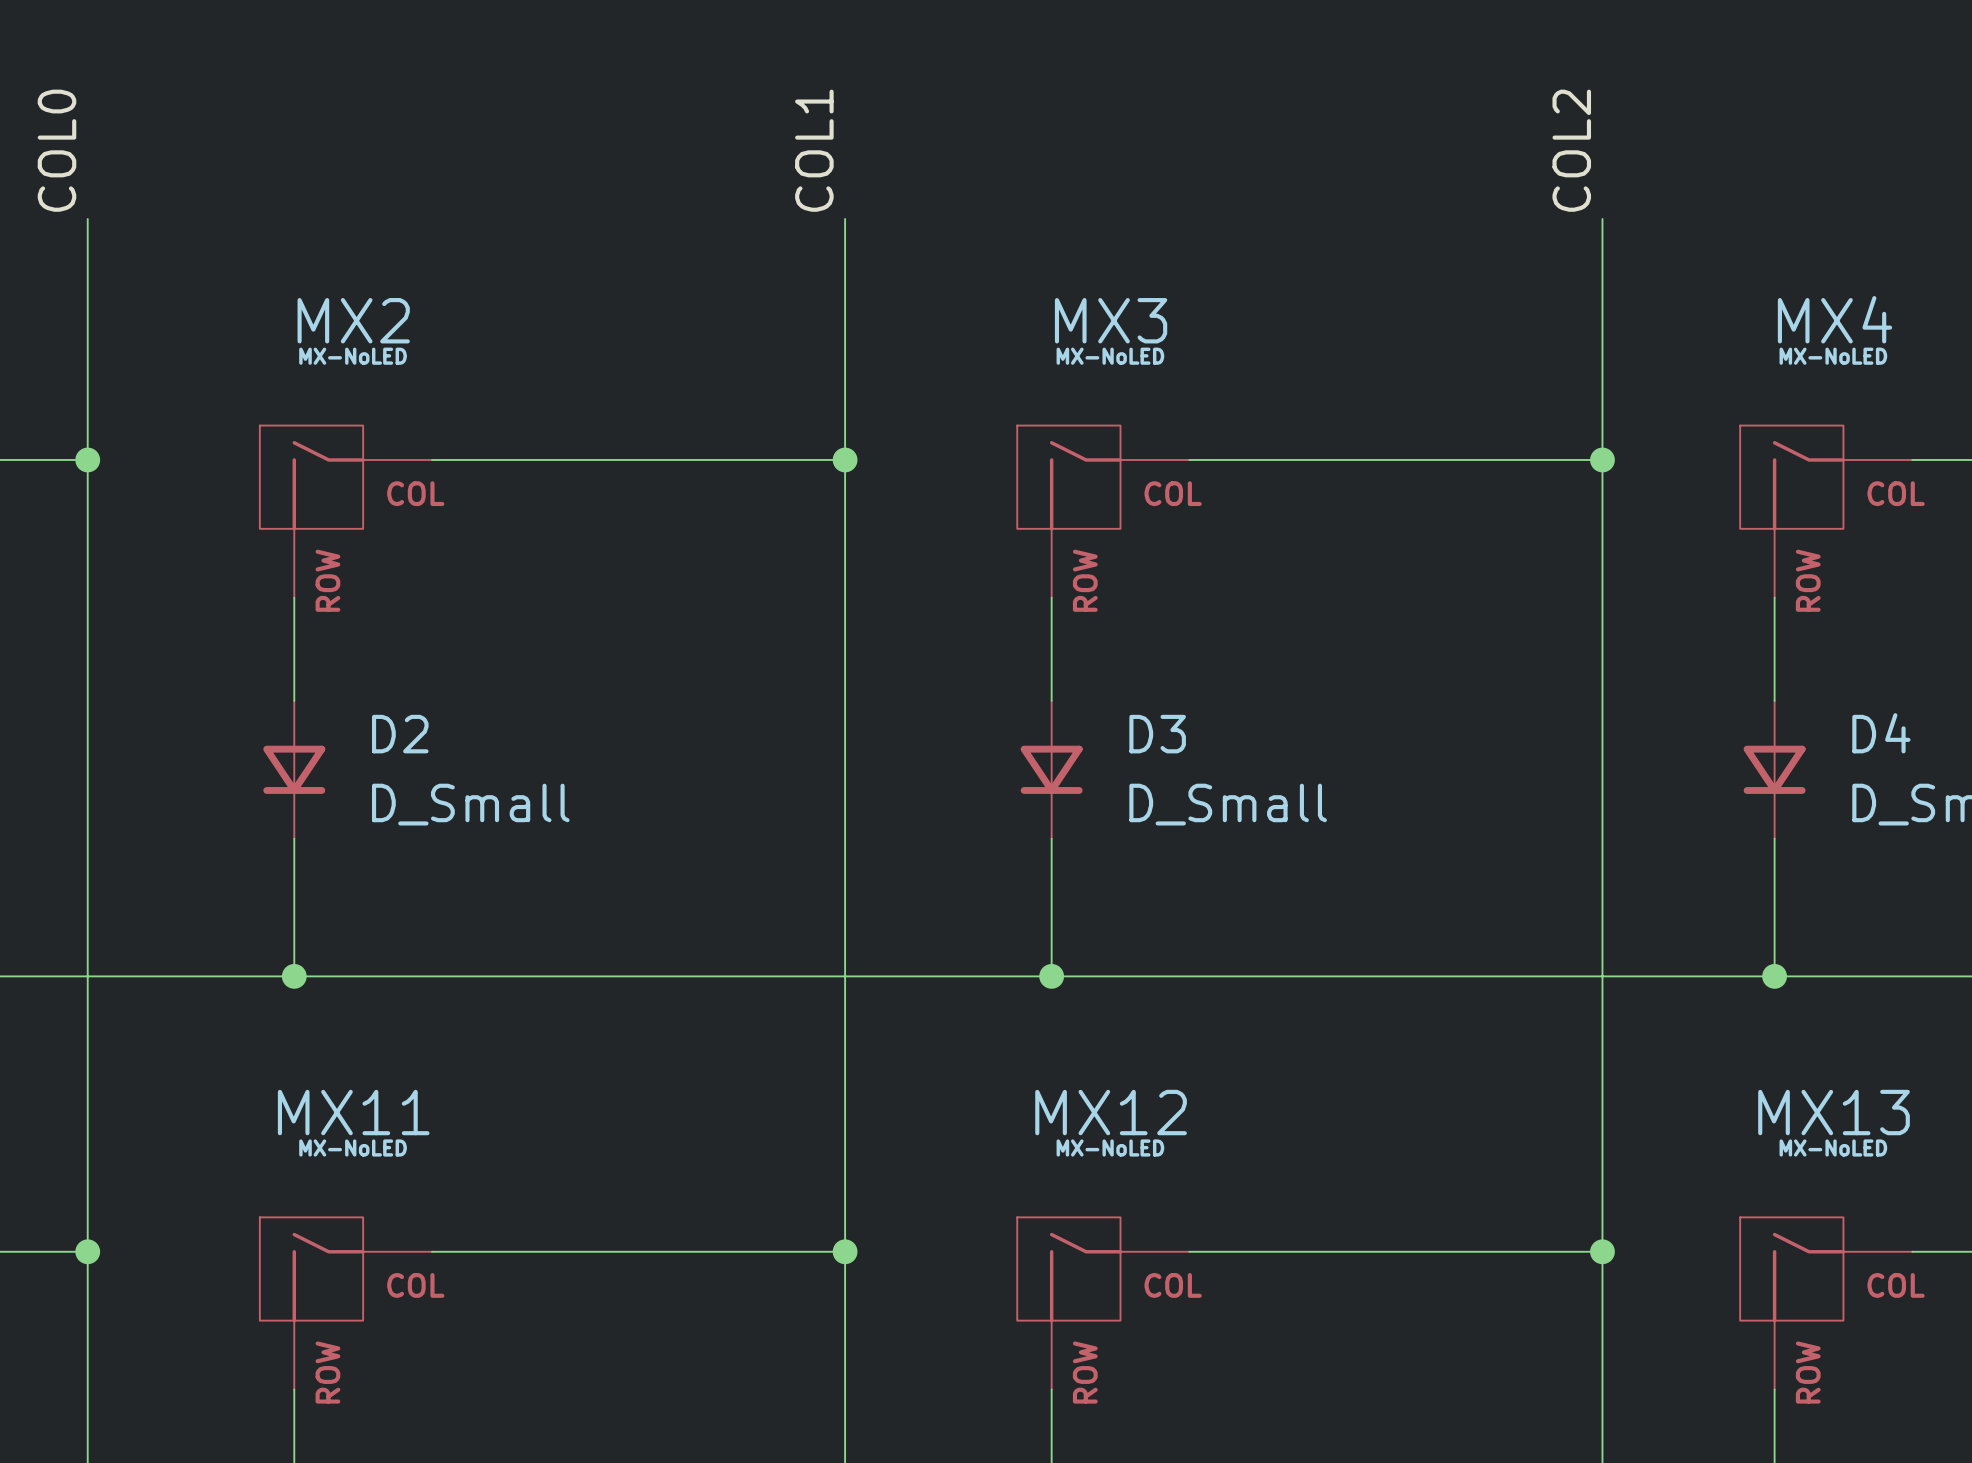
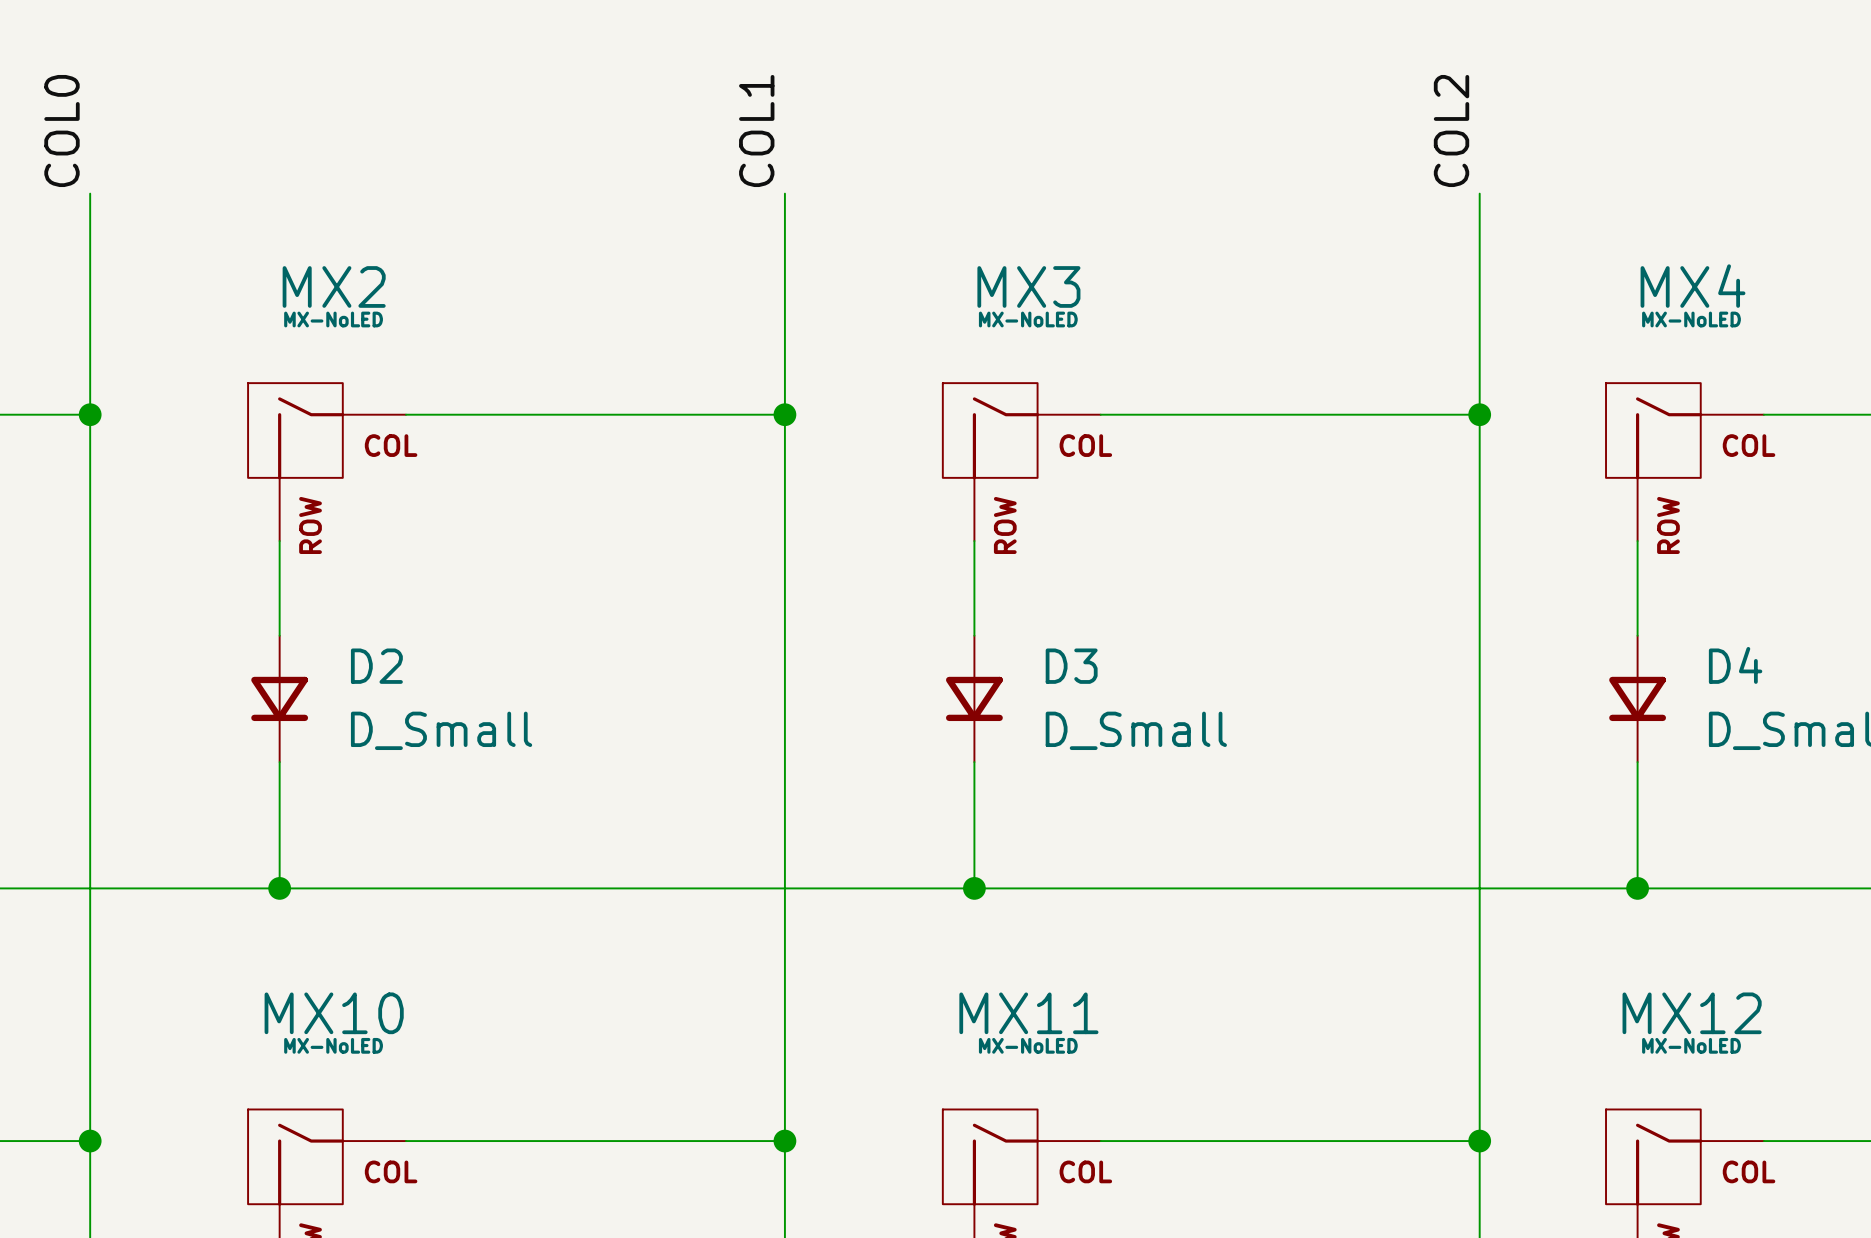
MX11 name: MX11 (353, 1112) -> MX10 (334, 1013)
MX12 name: MX12 (1111, 1112) -> MX11 (1028, 1013)
MX13 name: MX13 (1834, 1112) -> MX12 (1692, 1013)

